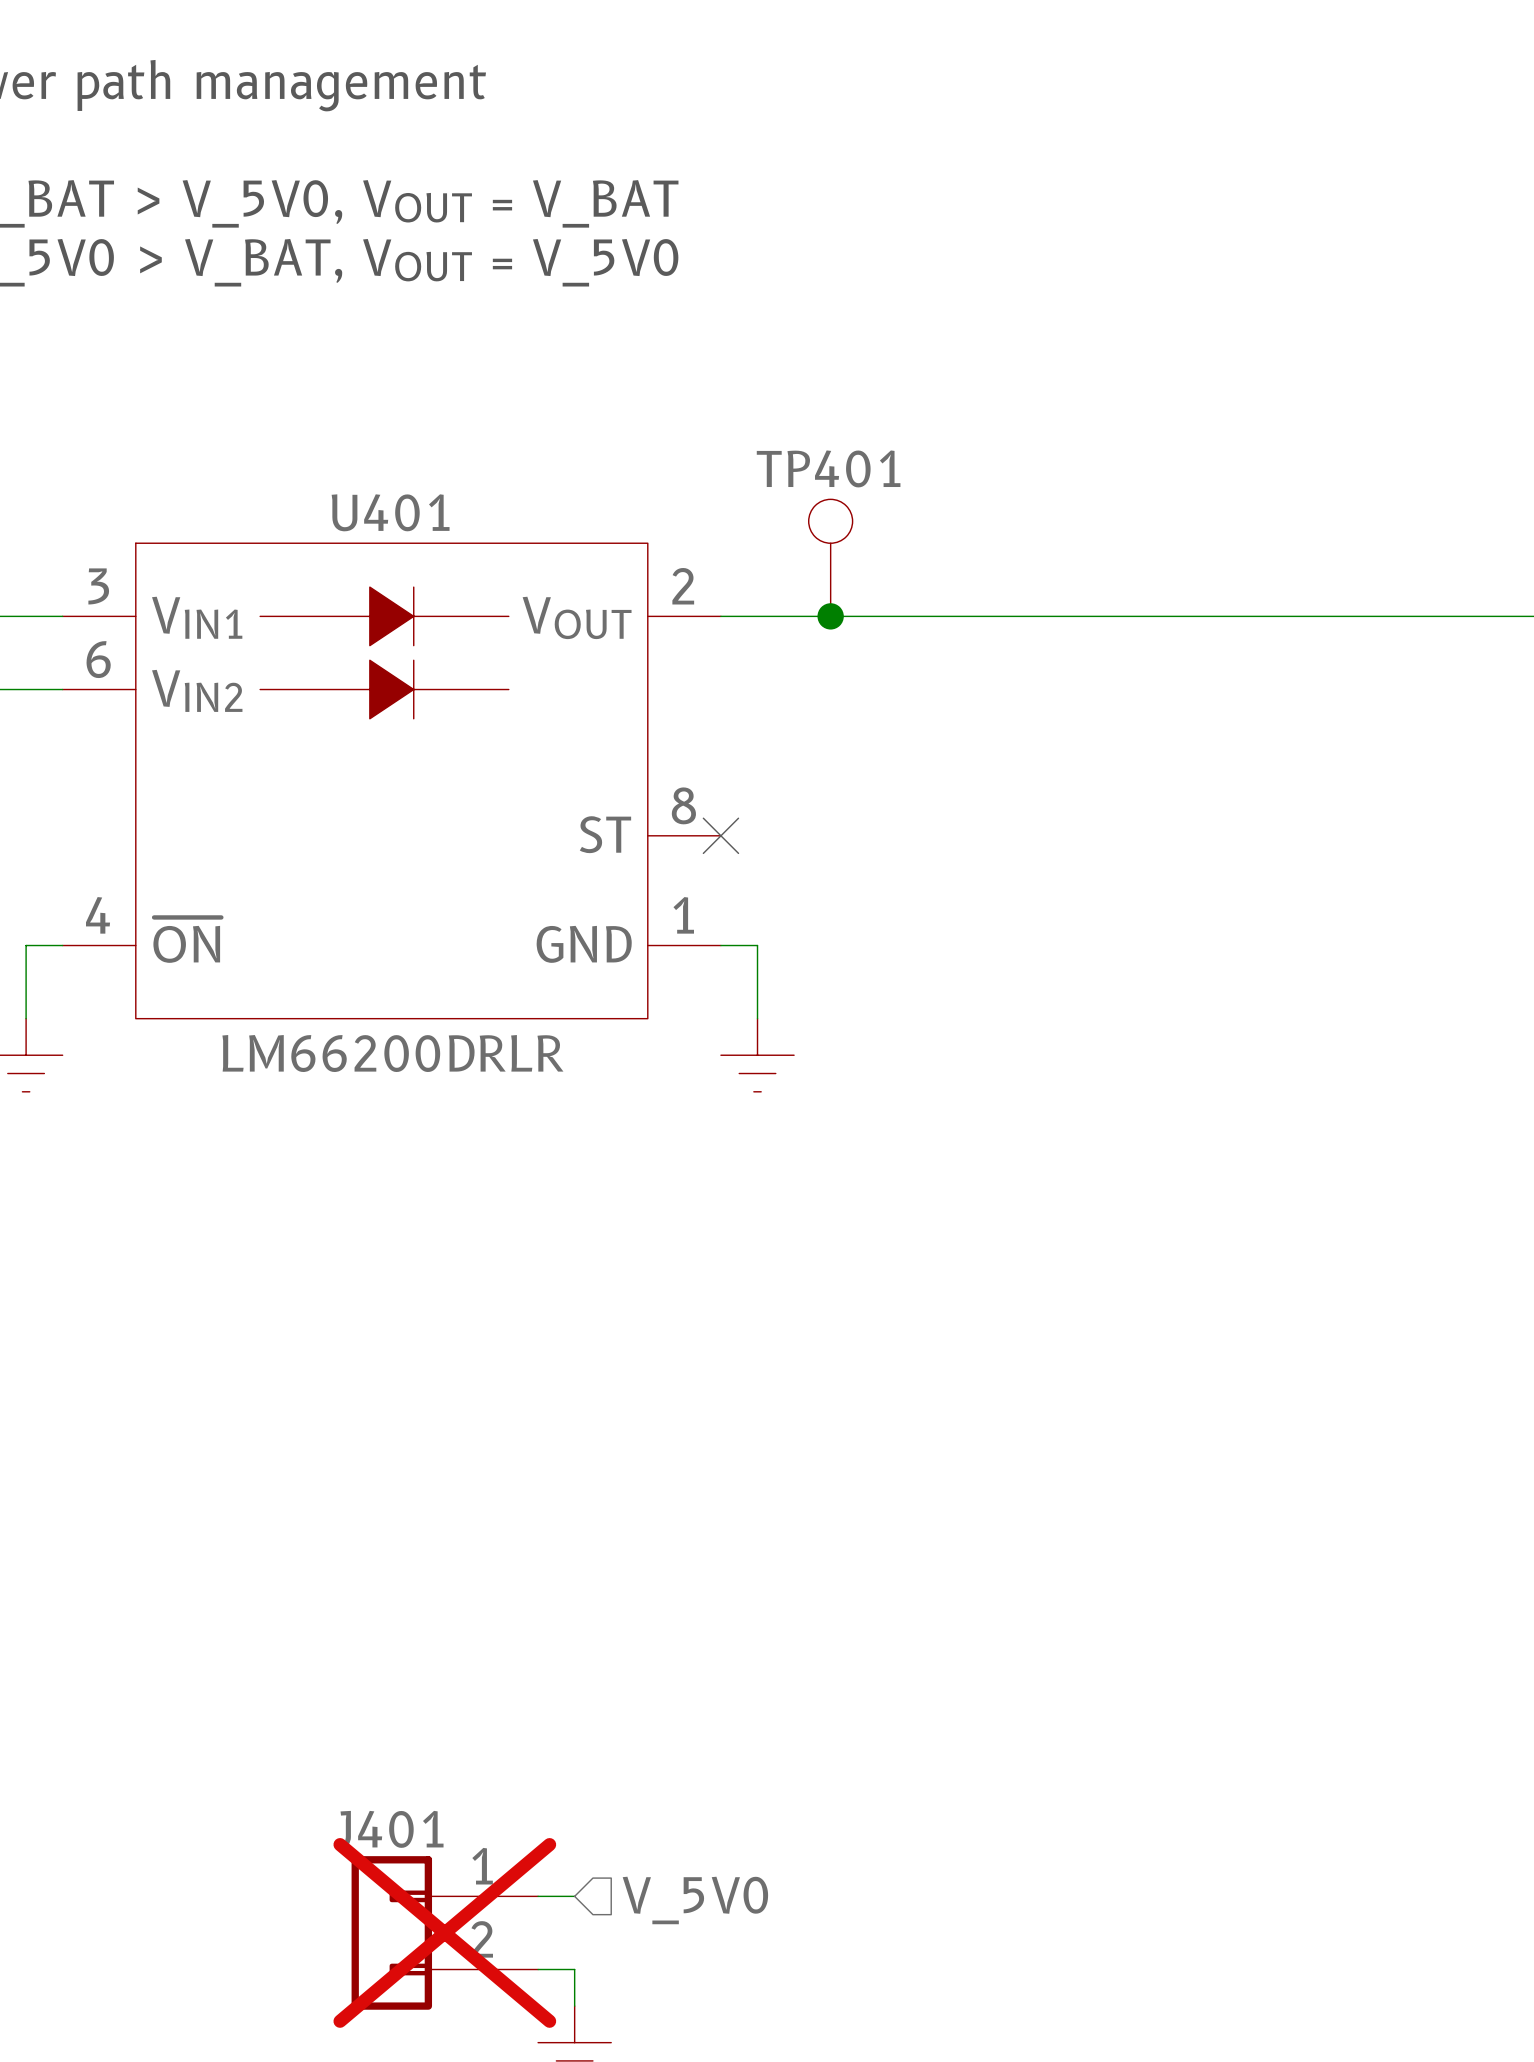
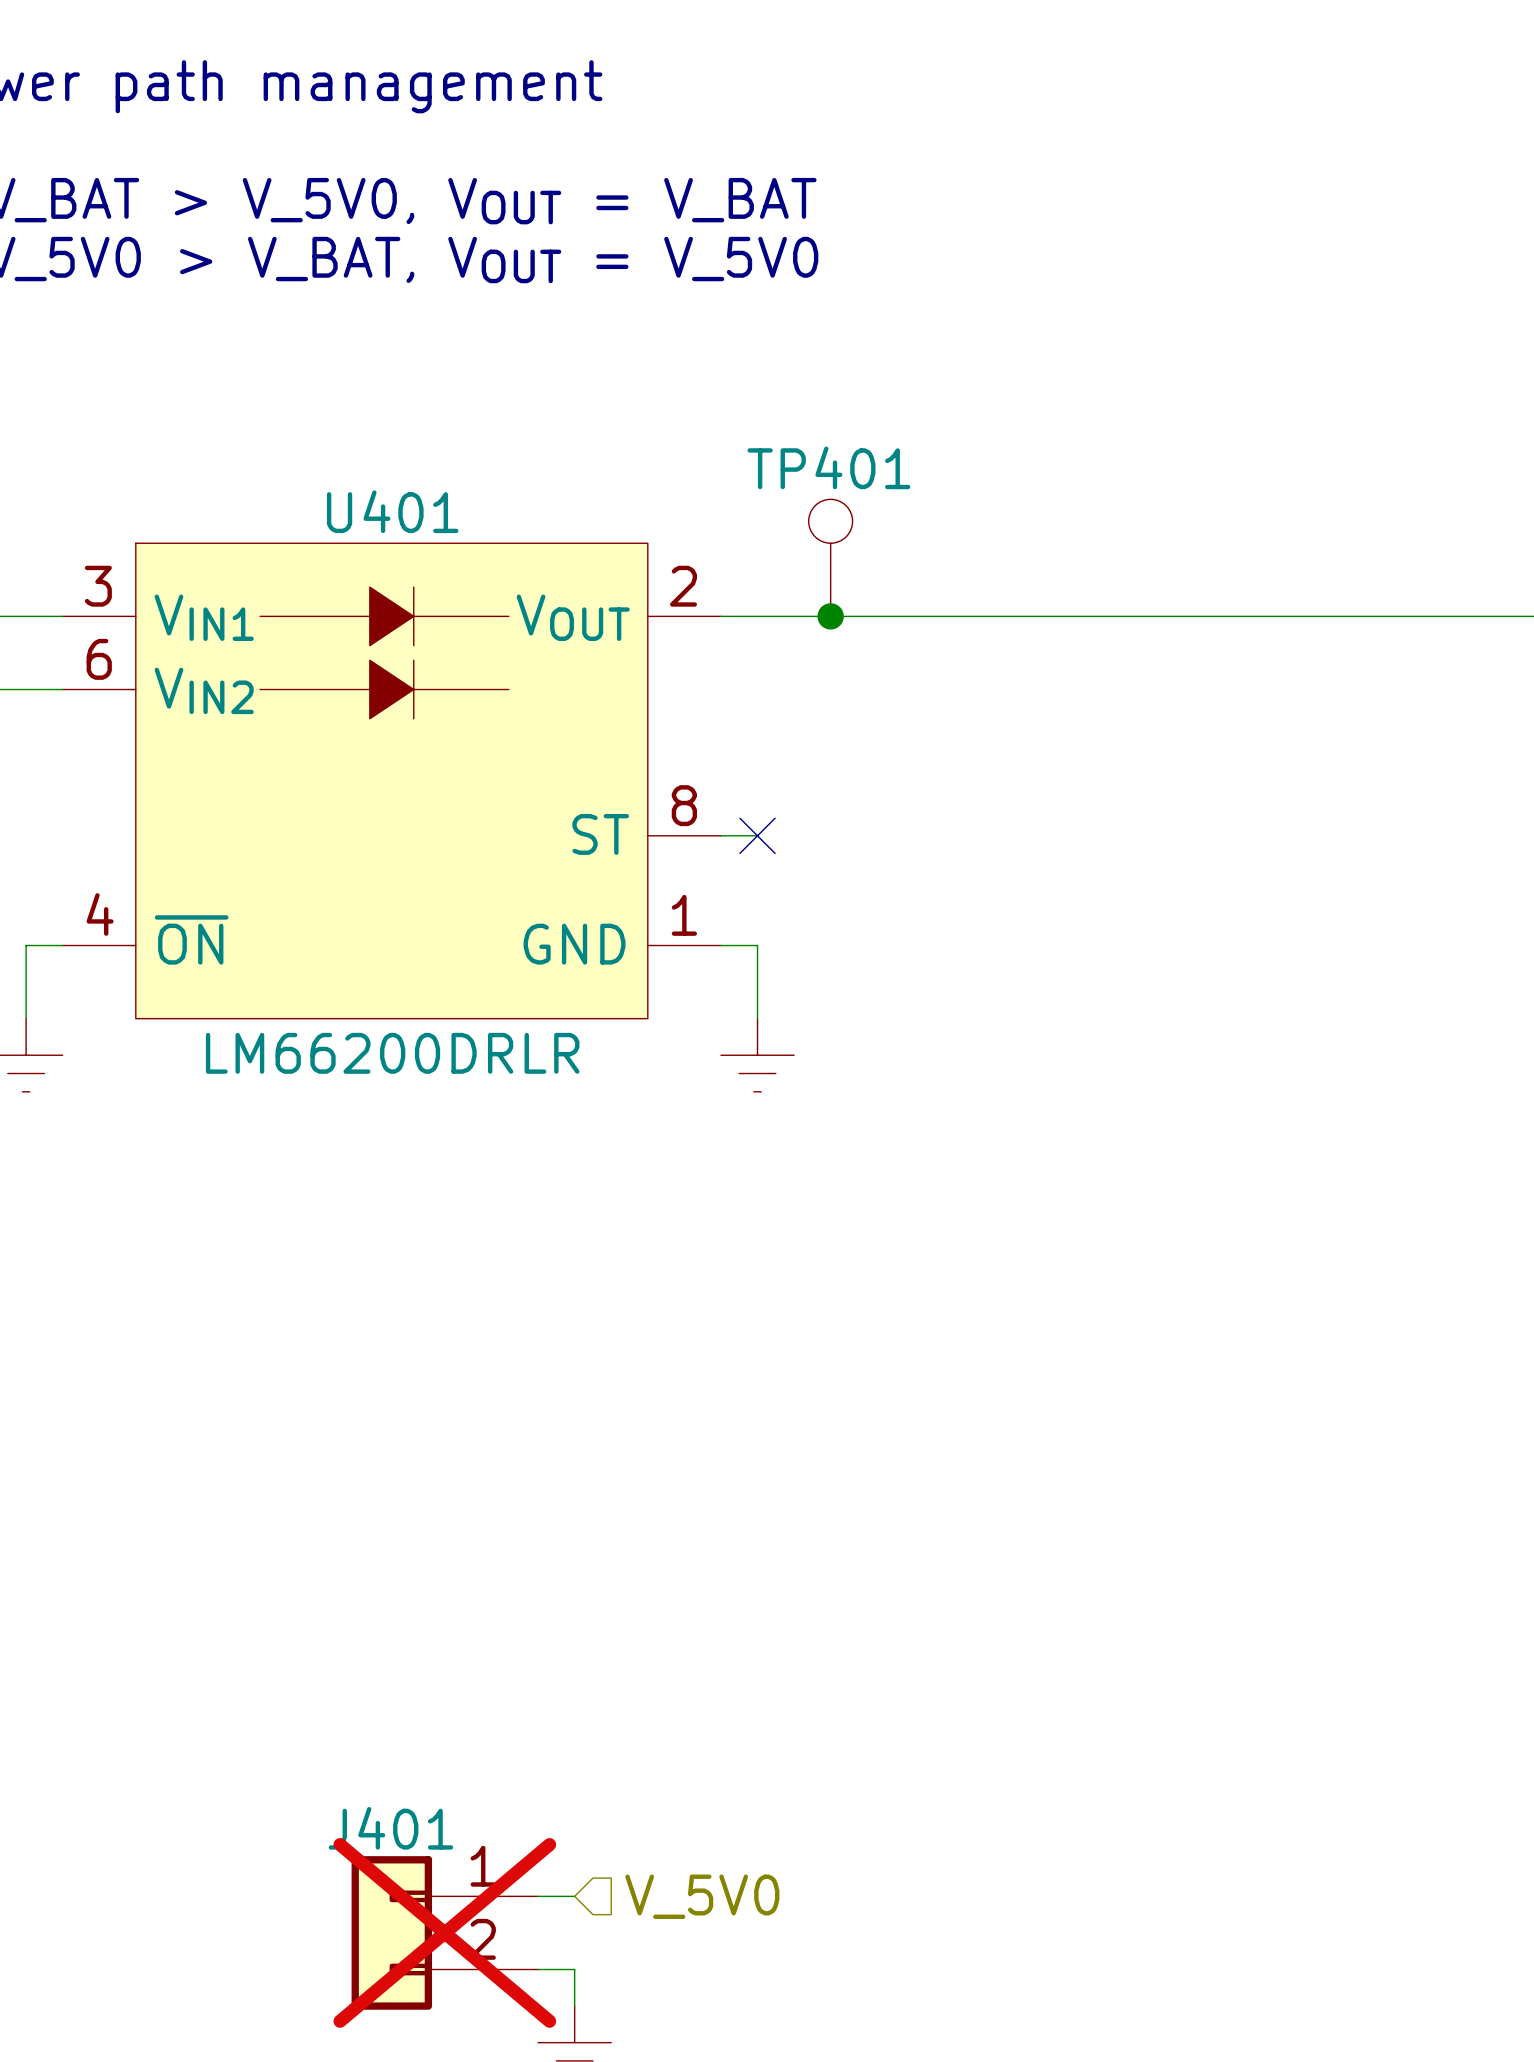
wire: none -> (720, 835) (757, 835)
no-connect mark position: (720, 835) -> (757, 835)

